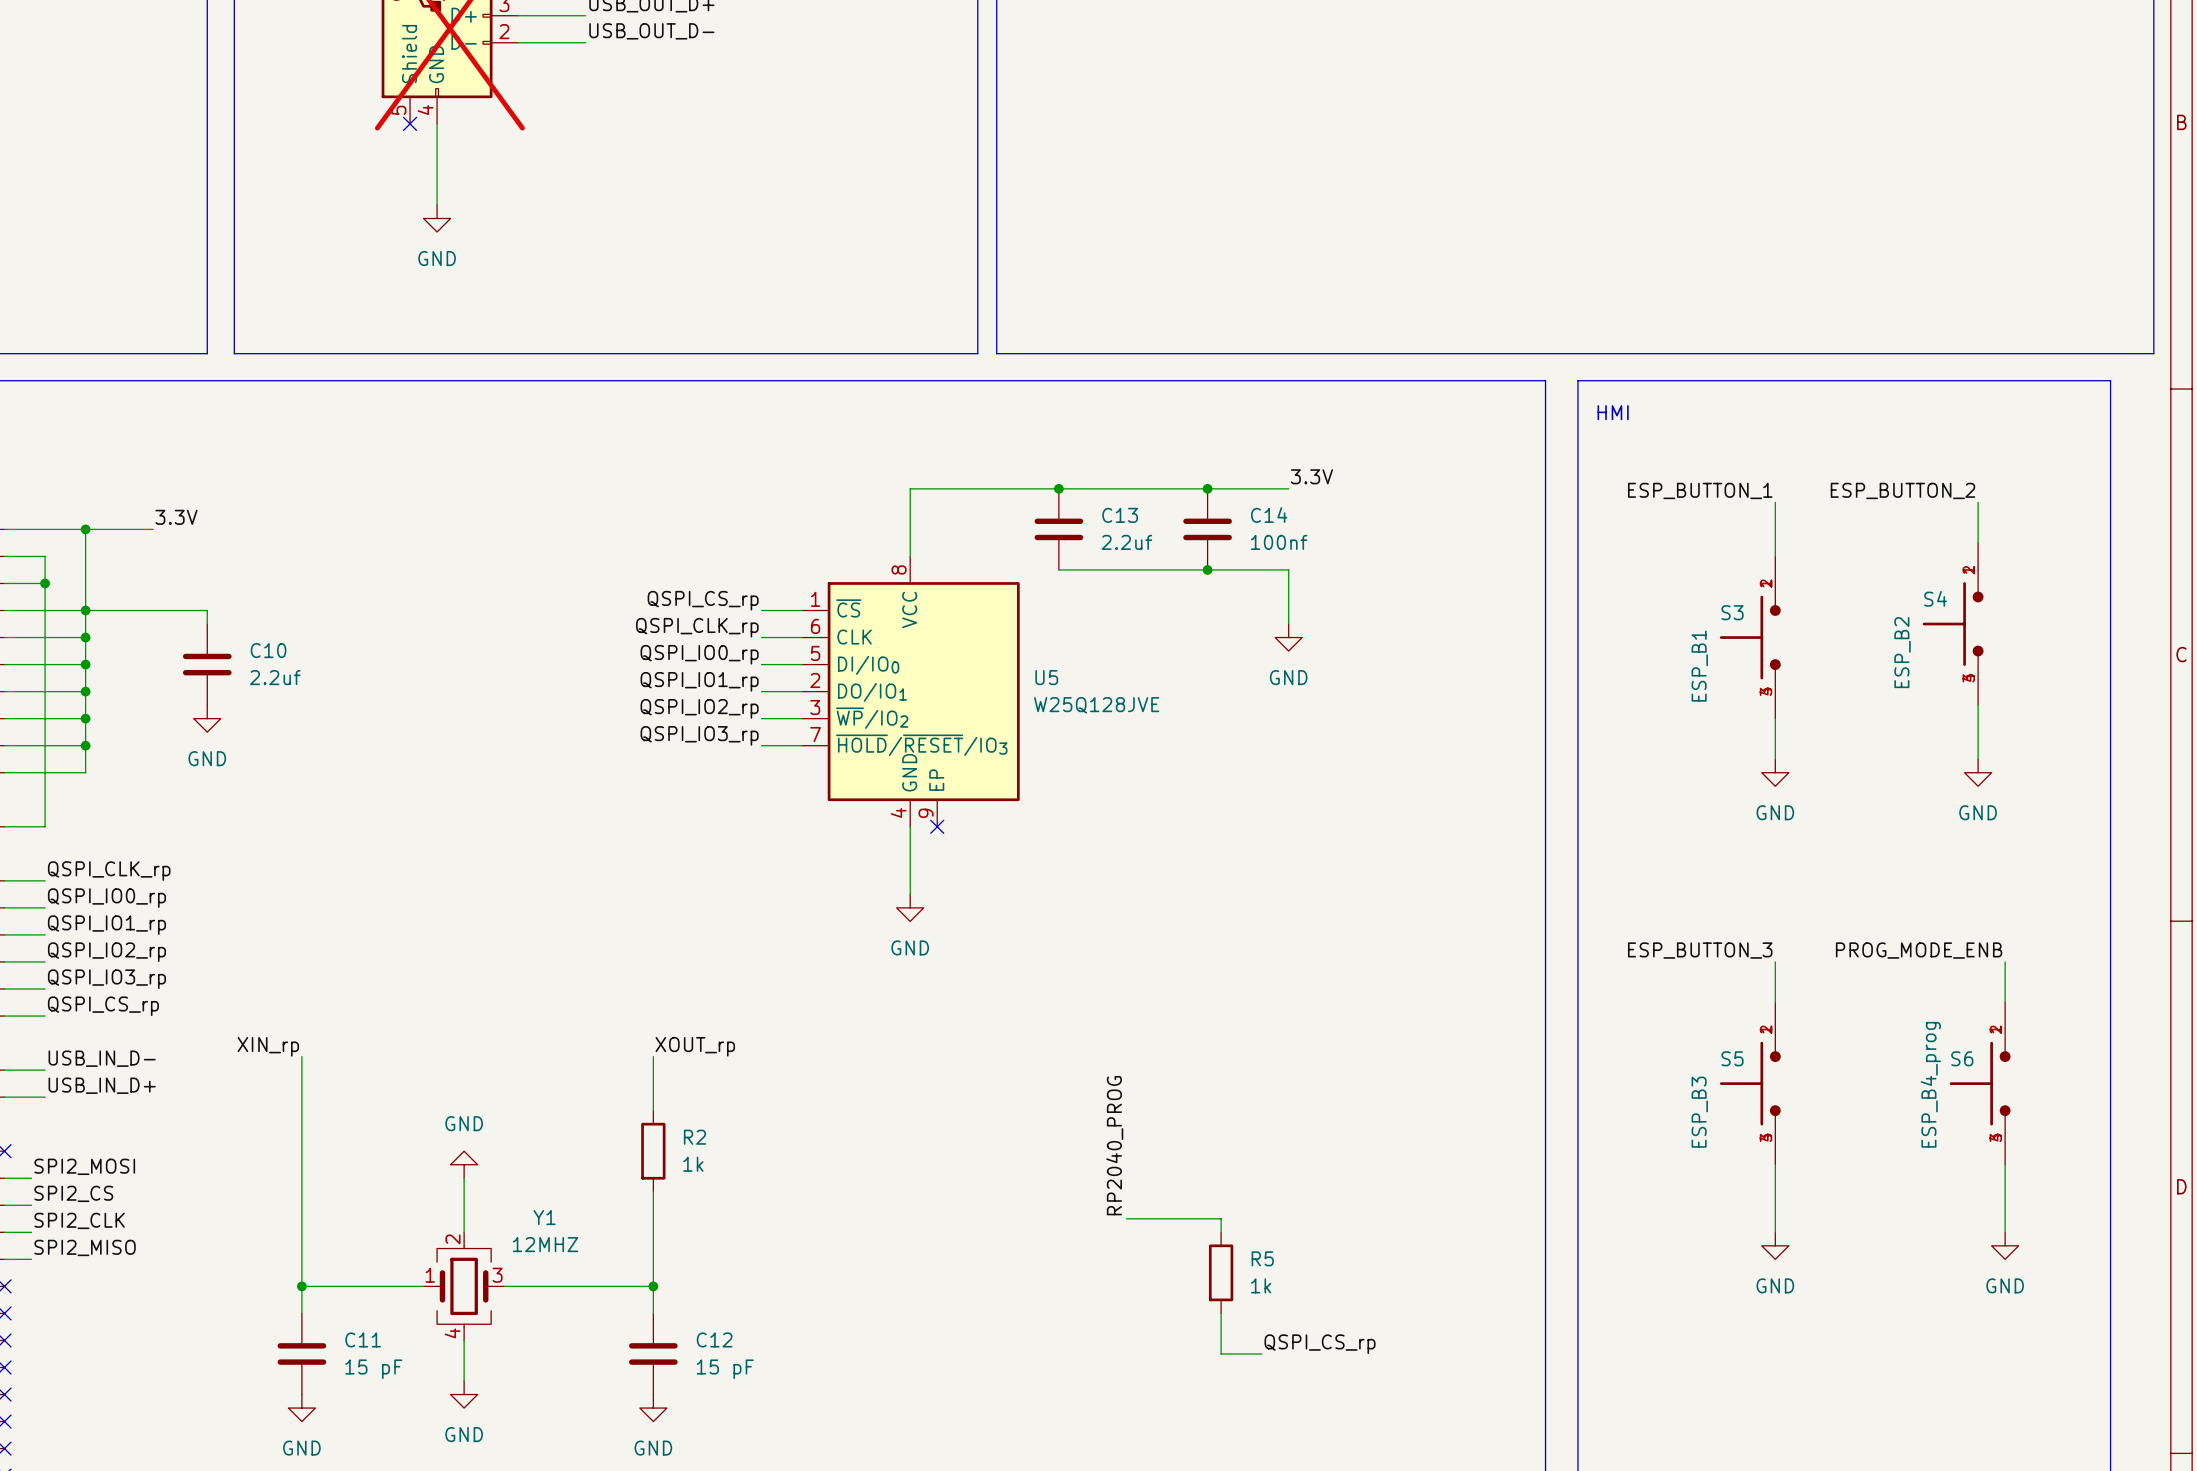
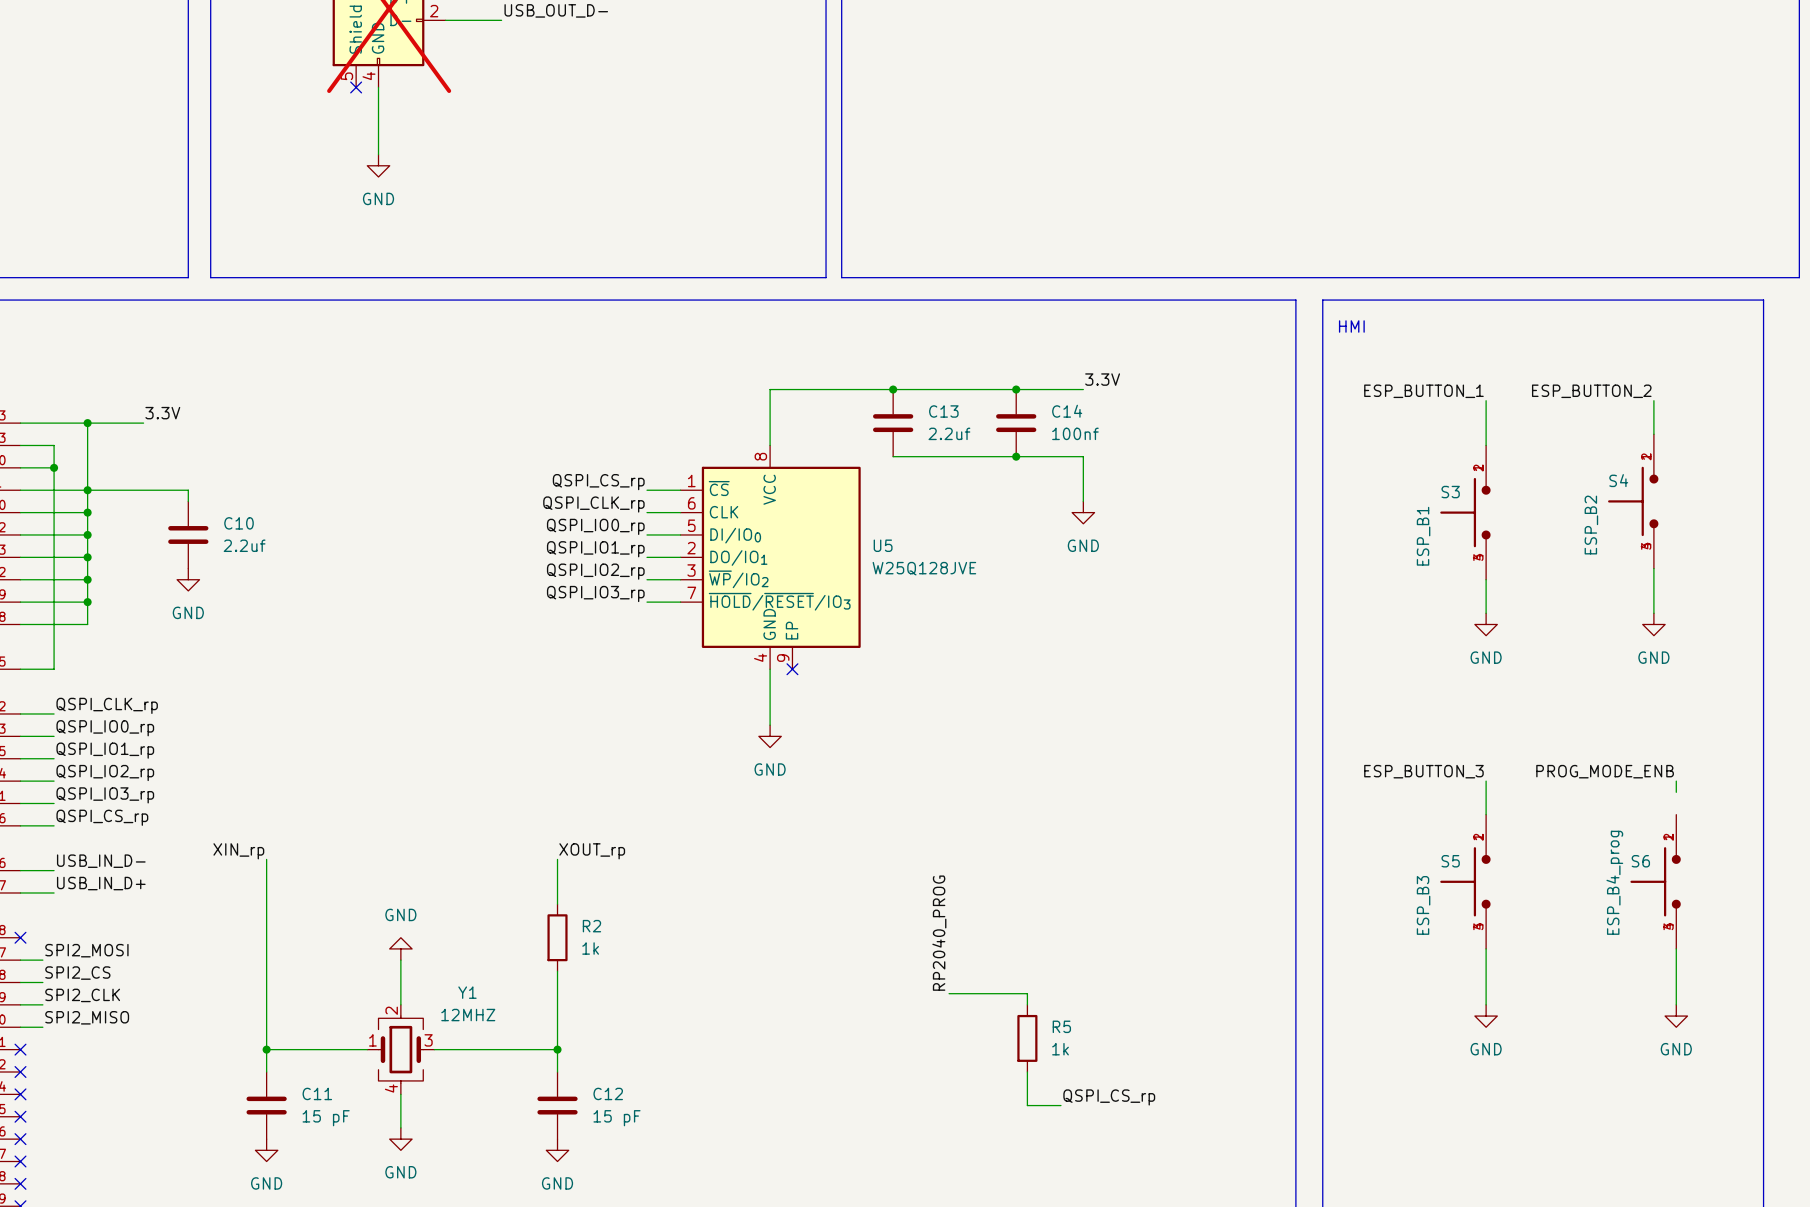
wire: (2005, 975) (2005, 1002) -> none

